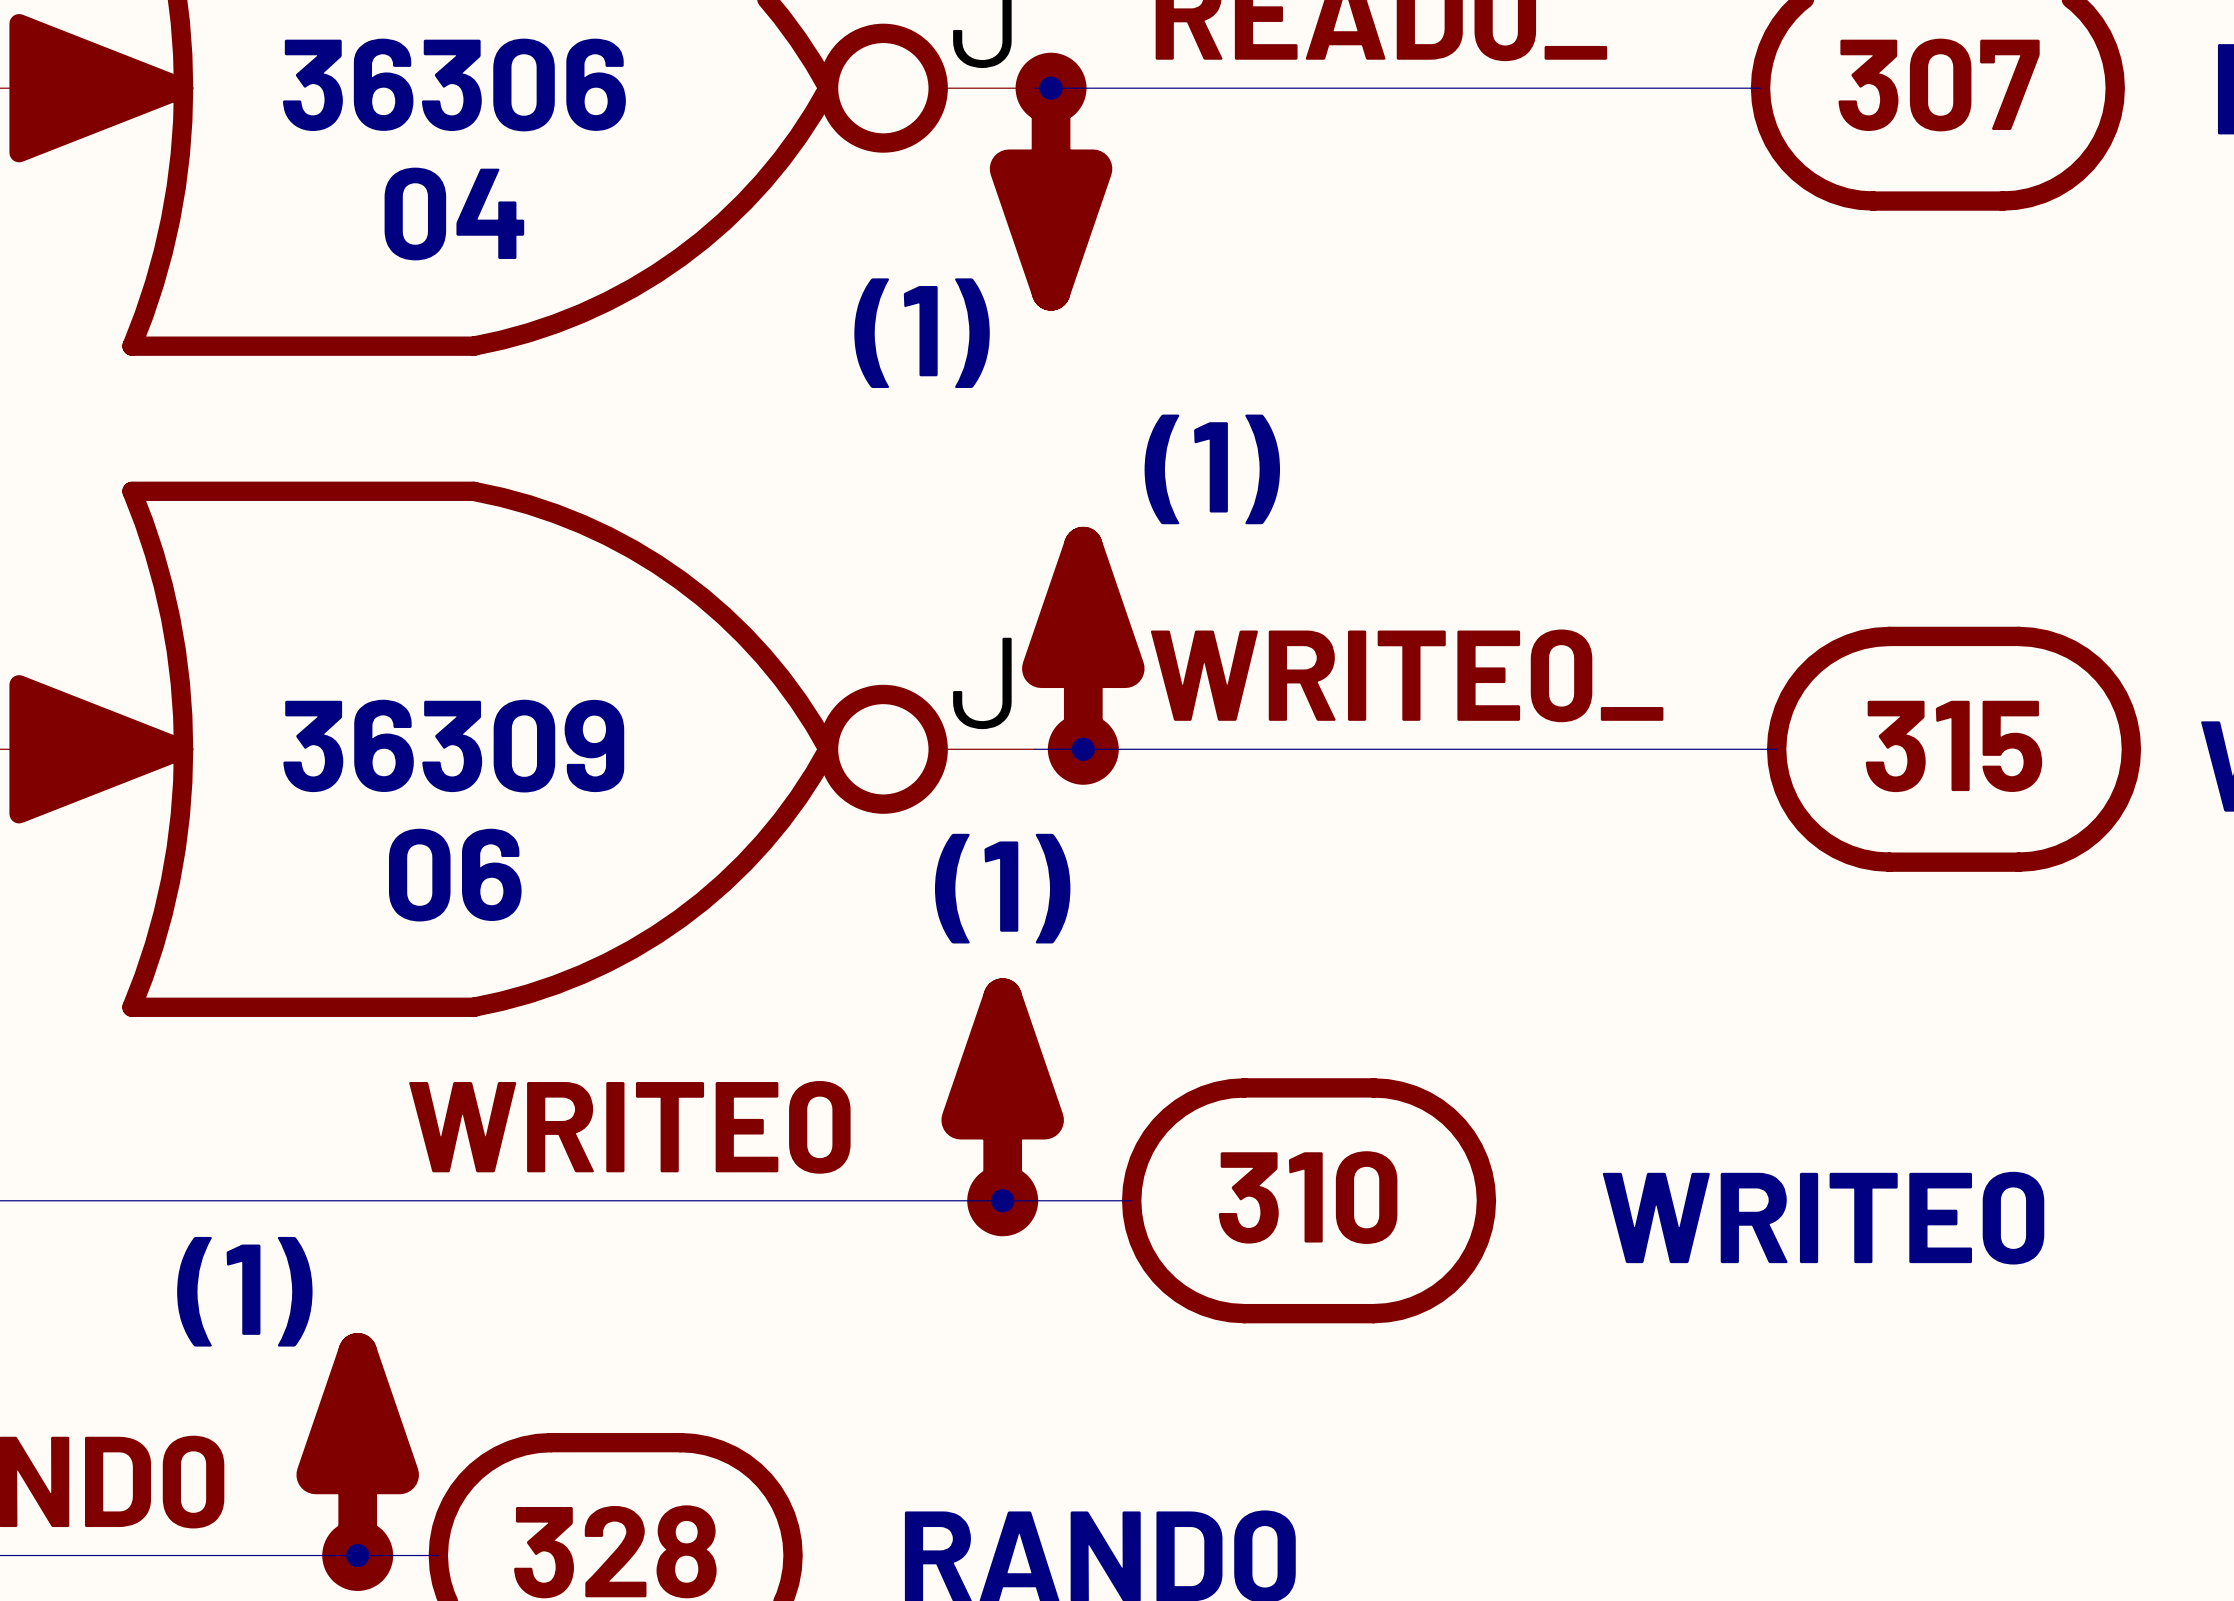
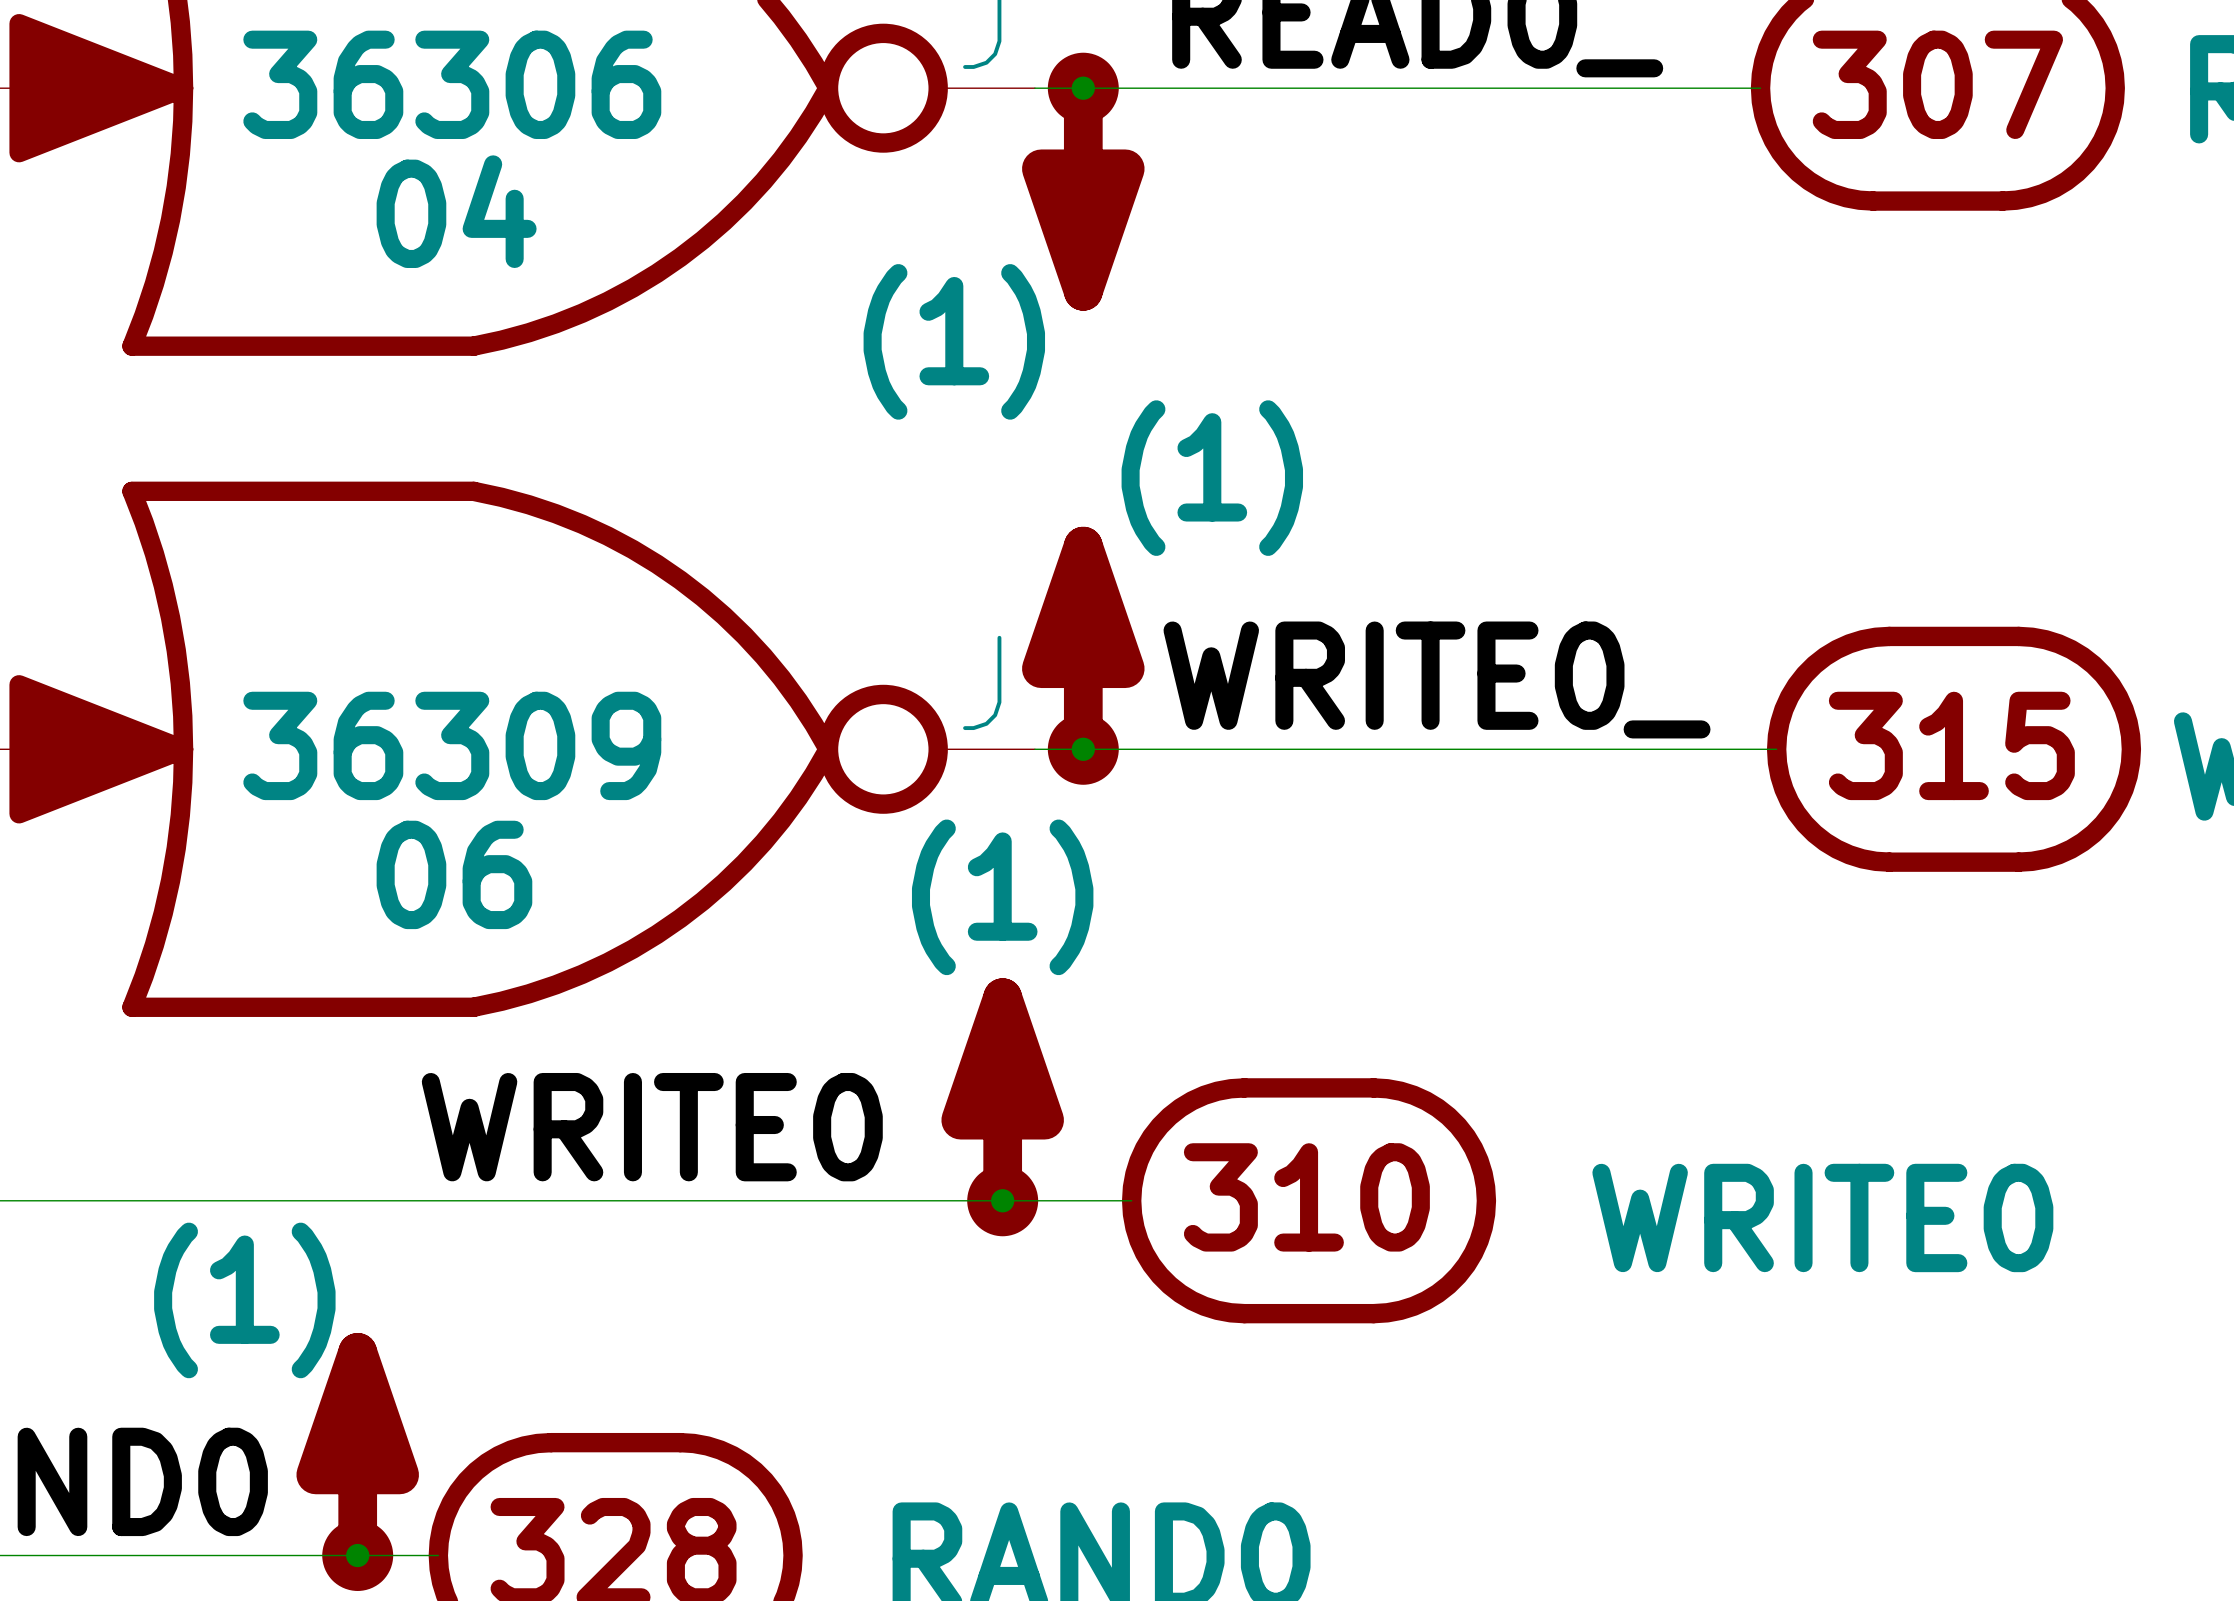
junction position: (1051, 88) -> (1083, 88)
part position: (1051, 181) -> (1083, 181)

